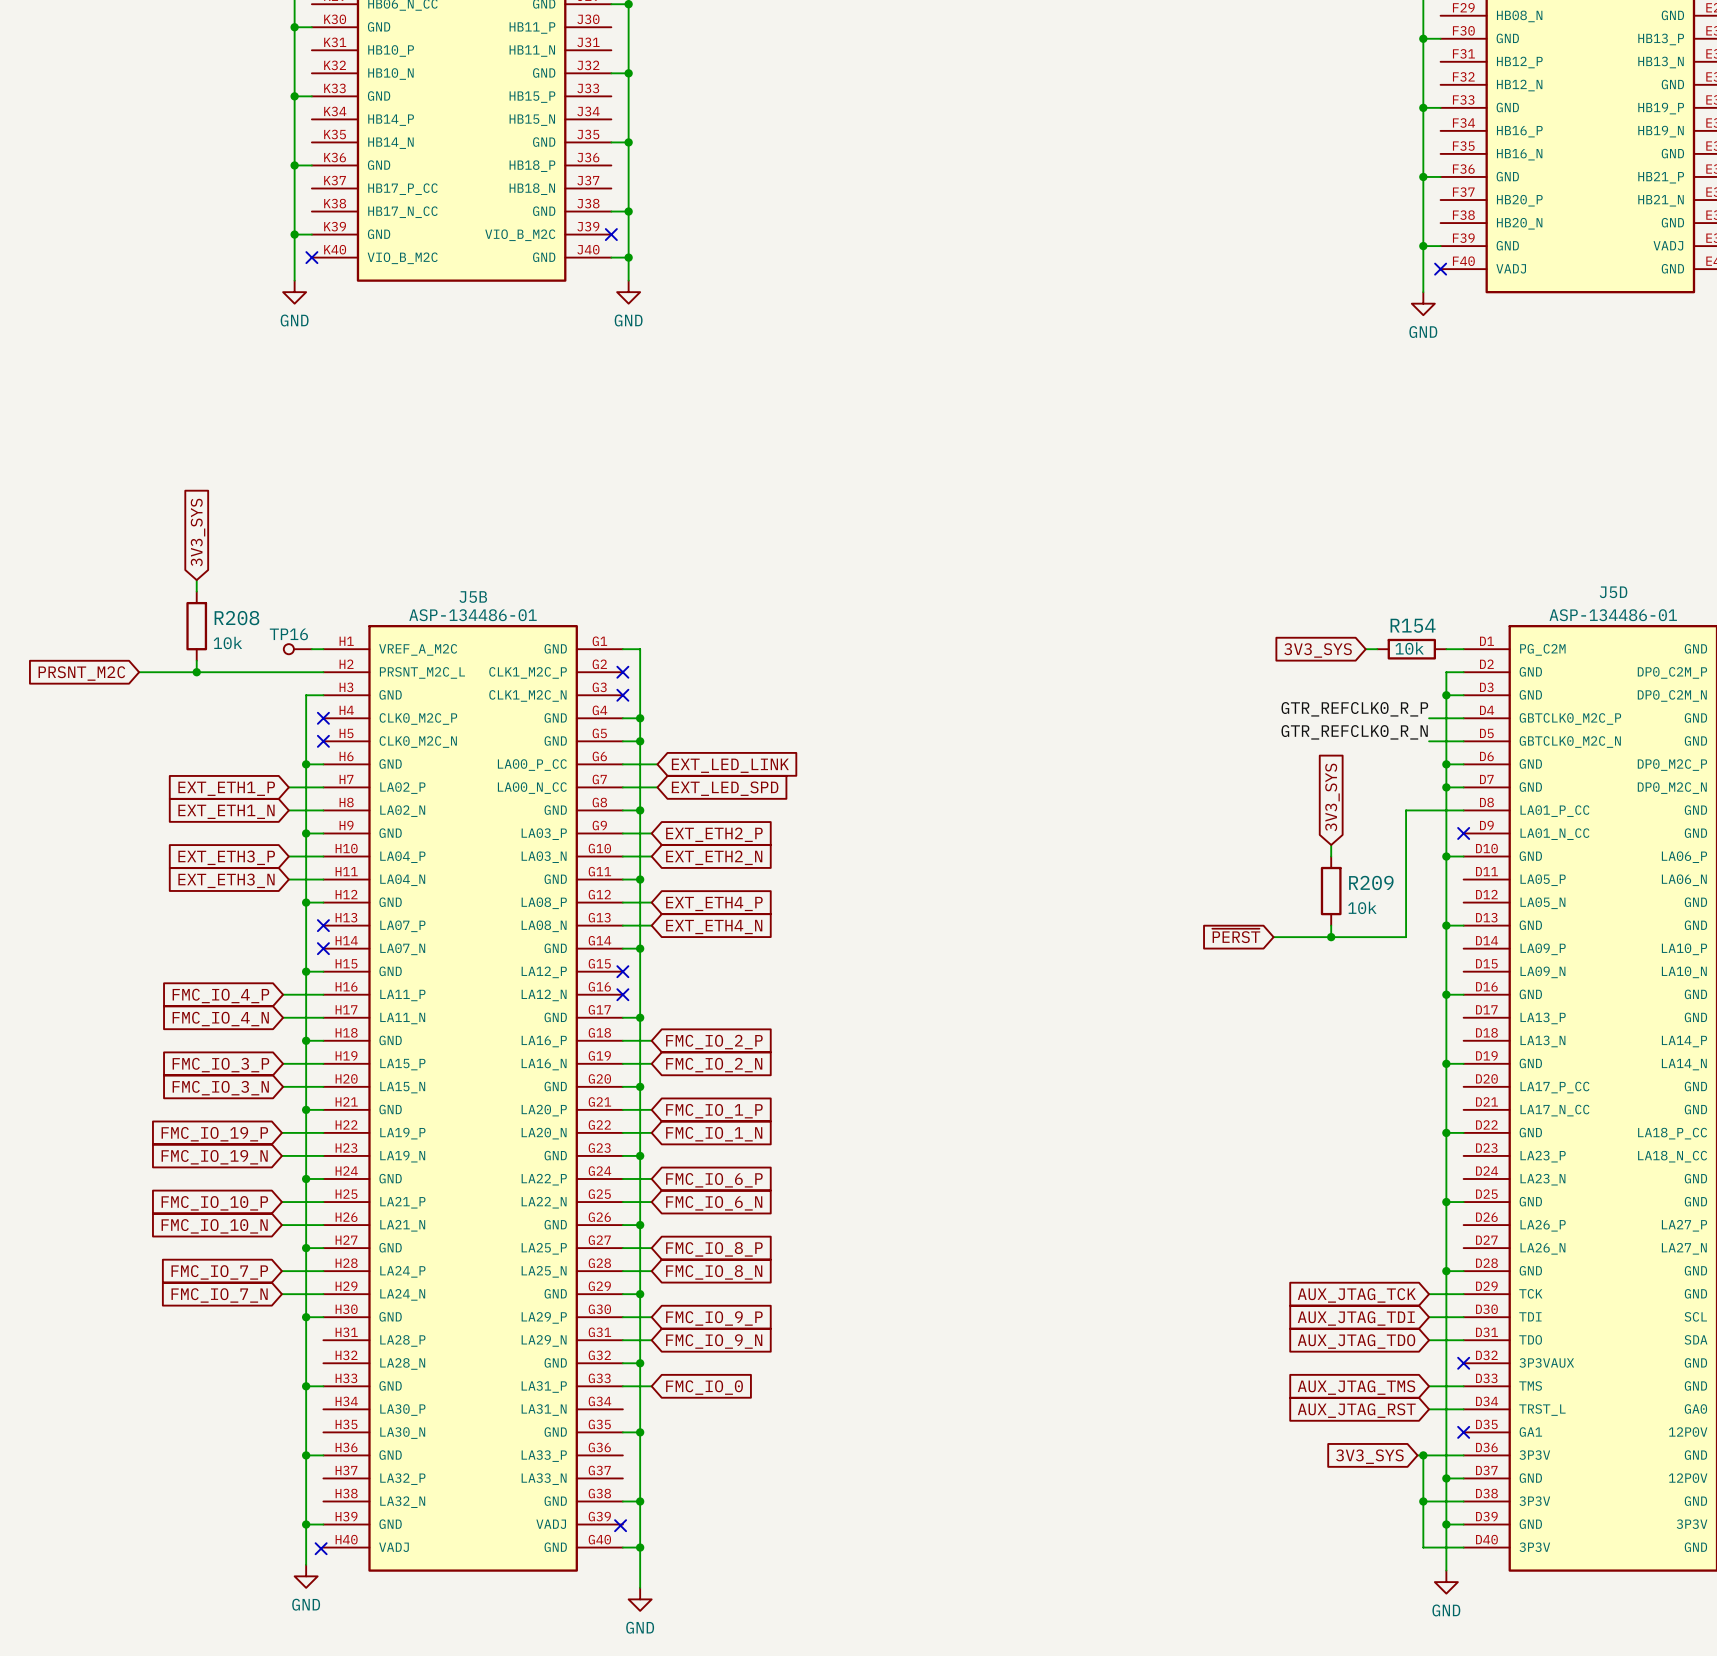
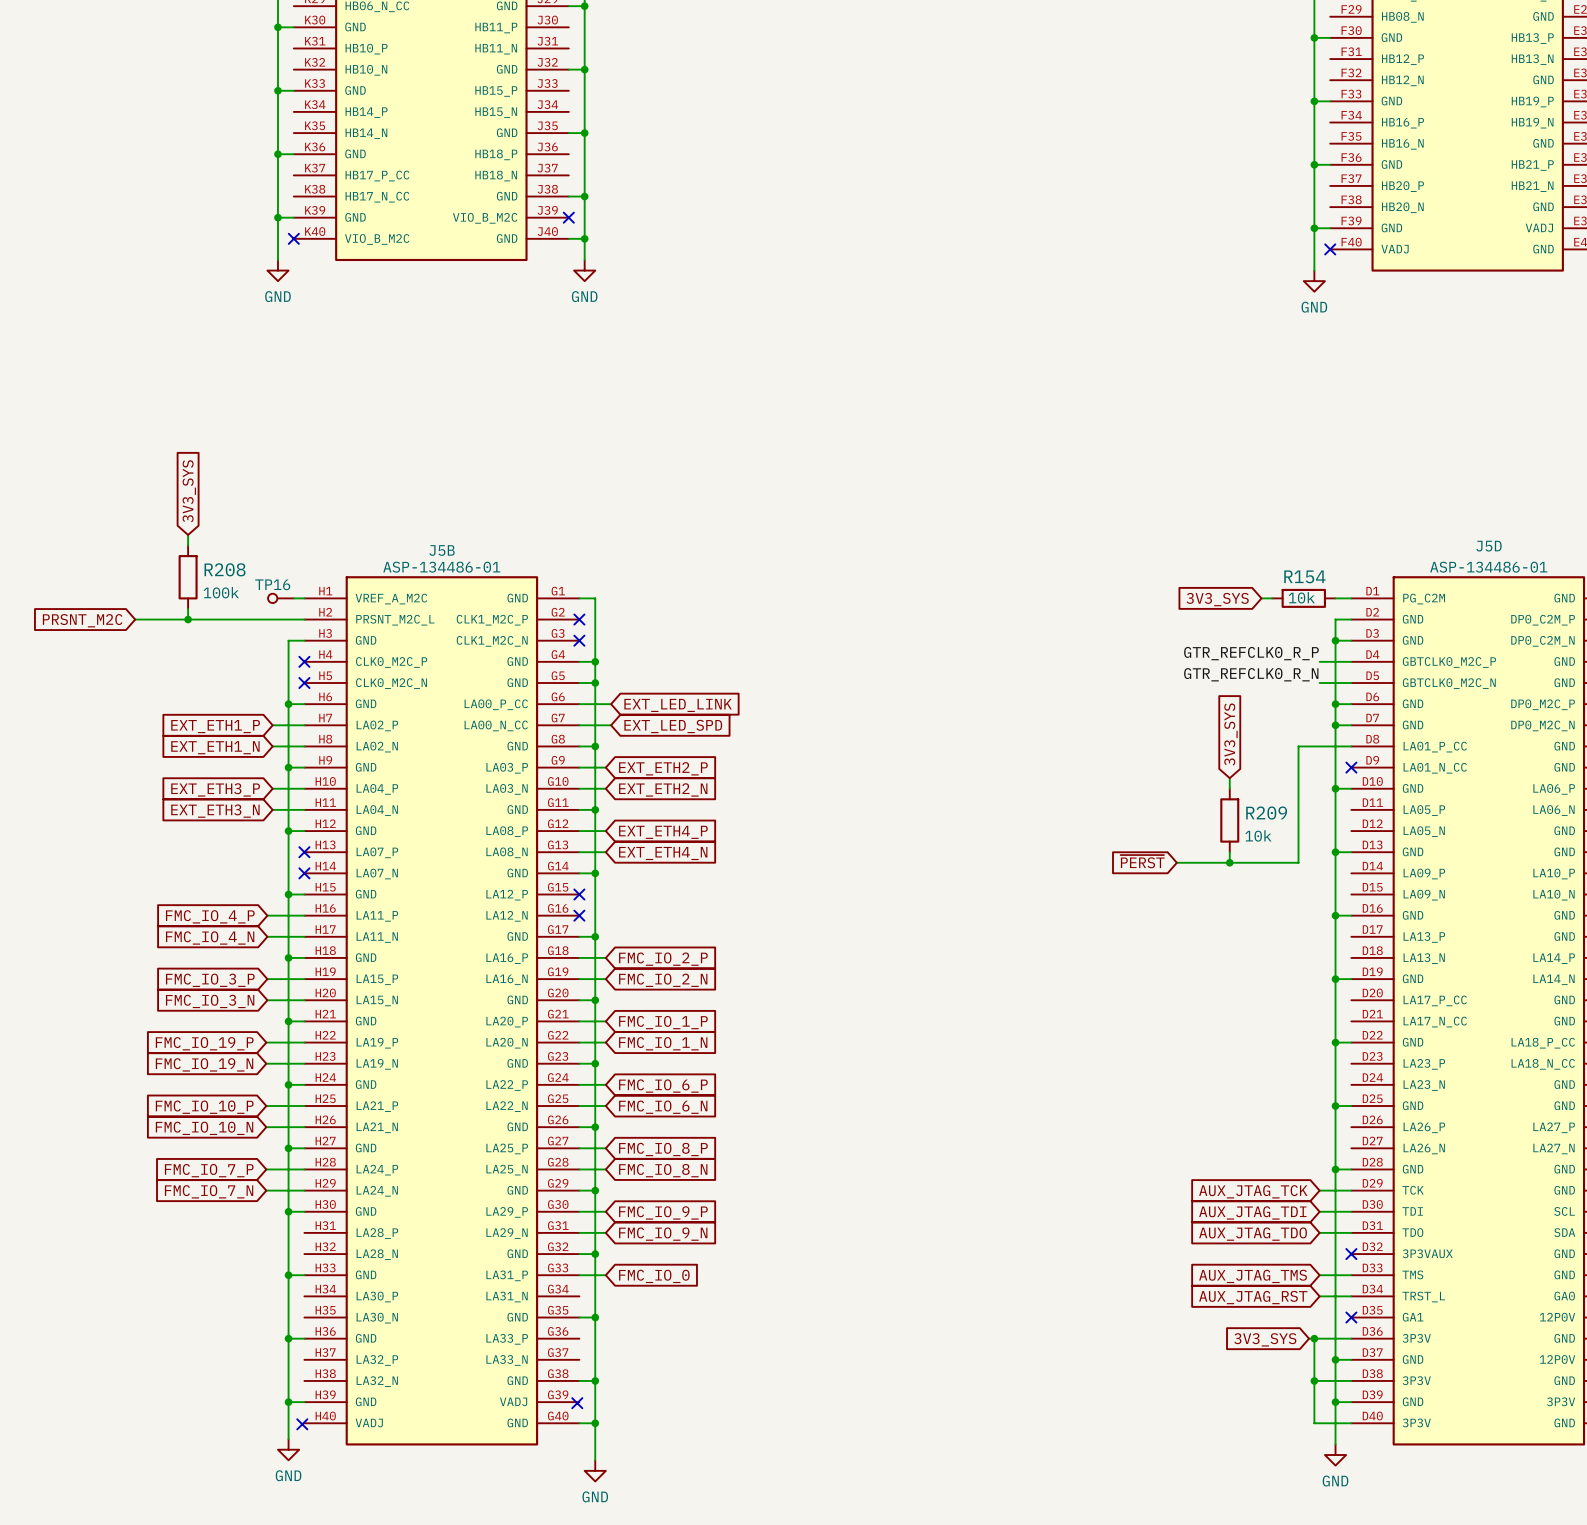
R208 text: 10k (227, 642) -> 100k (221, 592)

